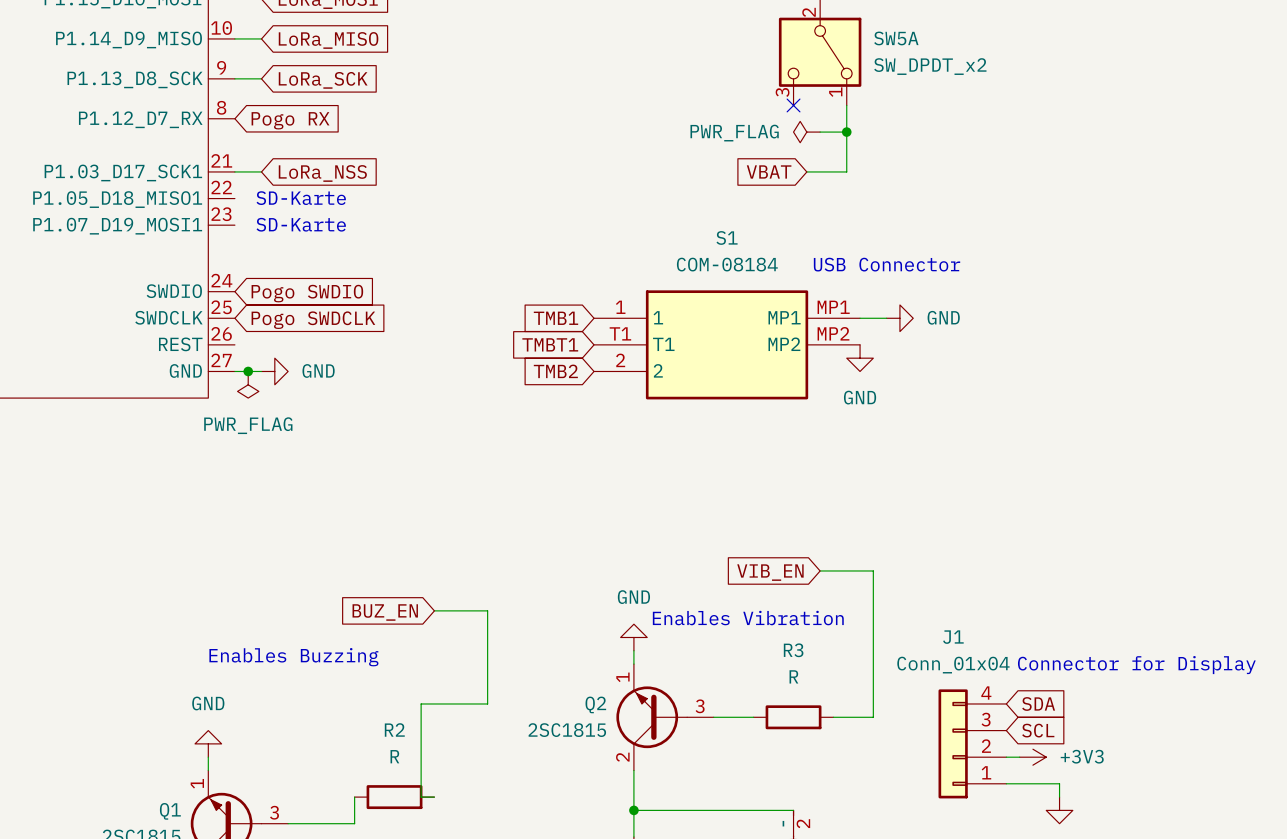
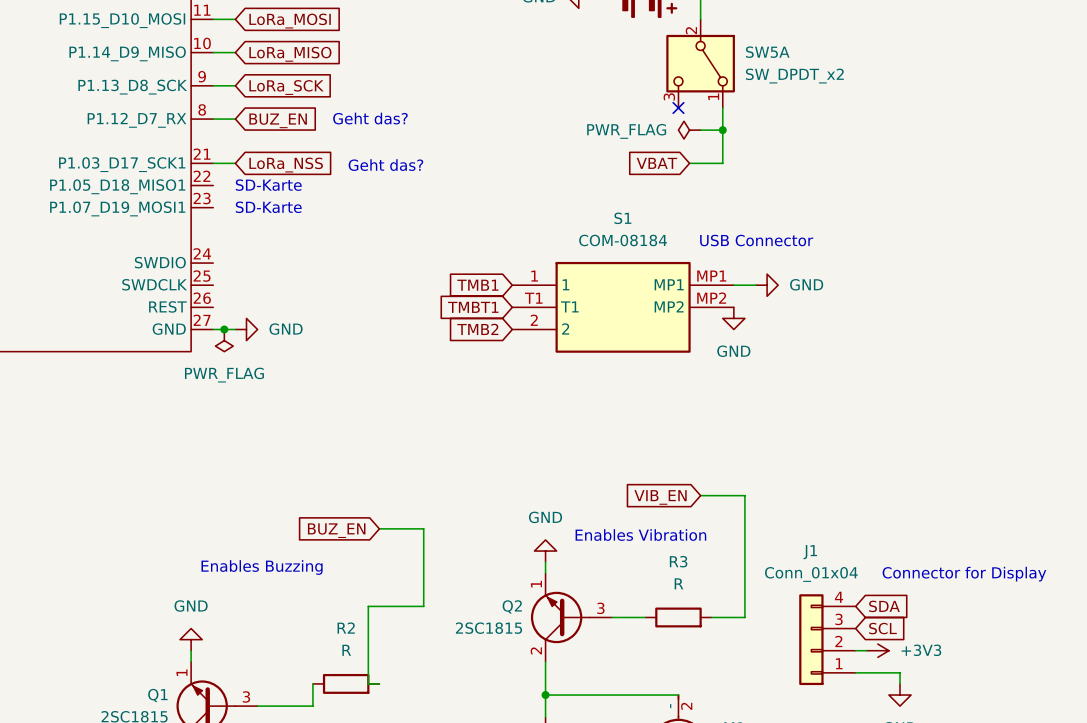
wire: none -> (213, 119) (235, 119)
text: none -> Geht das? (370, 118)
global label: Pogo RX (290, 120) -> none
global label: none -> BUZ_EN (278, 120)
text: none -> Geht das? (385, 165)
global label: Pogo SWDIO (307, 293) -> none
global label: Pogo SWDCLK (313, 320) -> none

